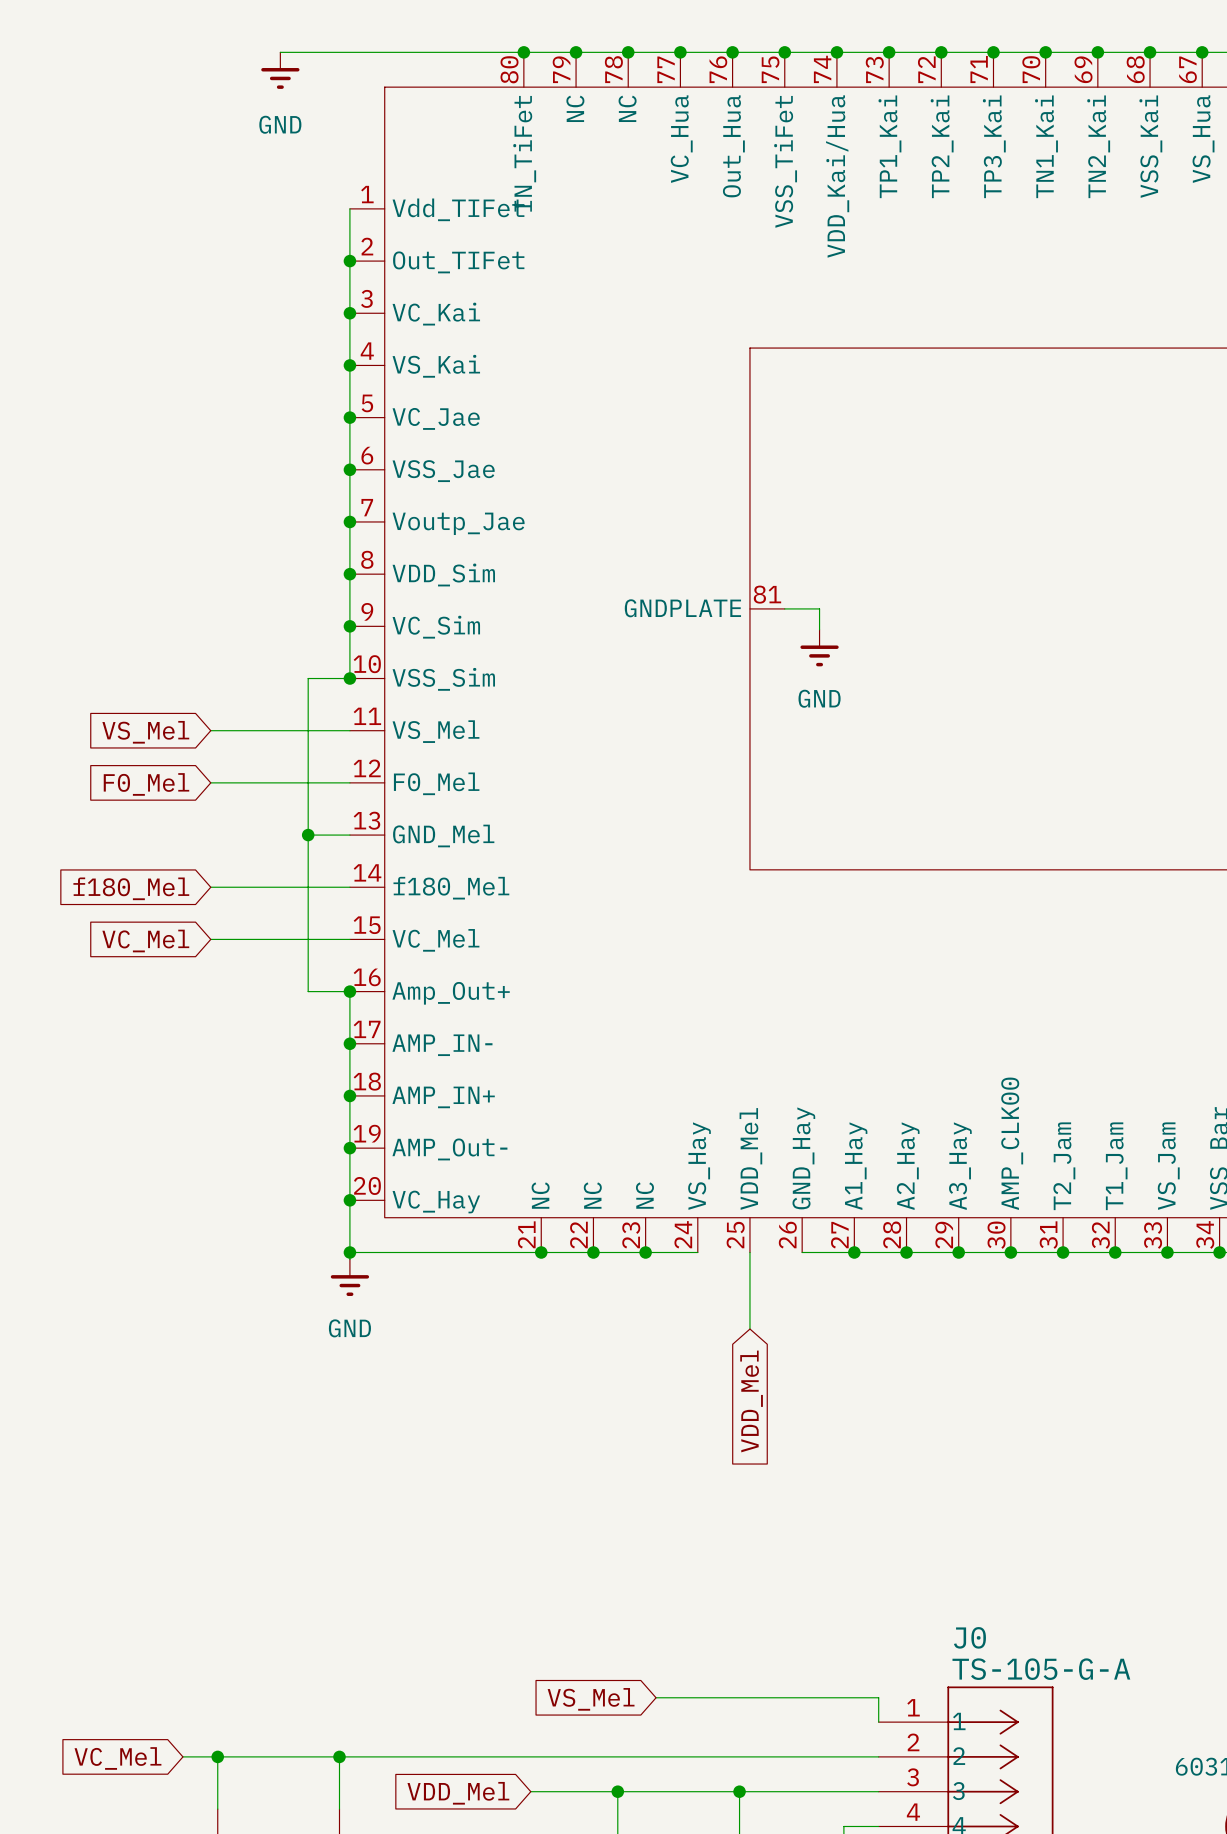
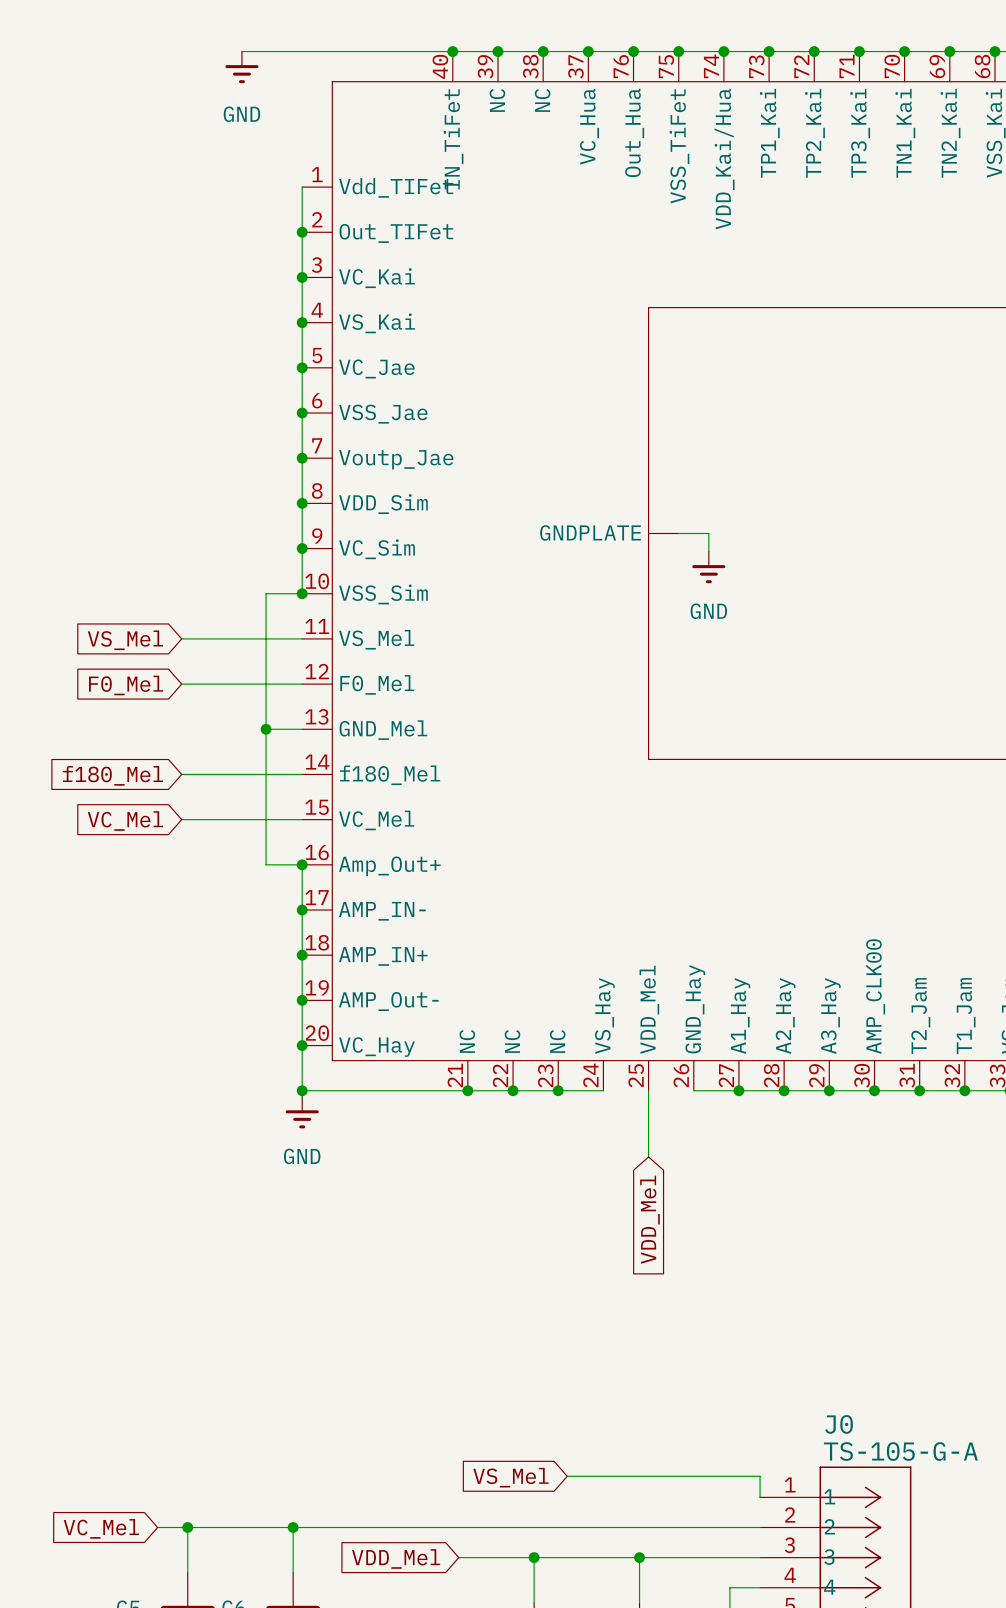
part pin number: 80 (509, 69) -> 40 (440, 66)
part pin number: 79 (561, 69) -> 39 (485, 66)
part pin number: 78 (613, 69) -> 38 (530, 66)
part pin number: 77 (666, 69) -> 37 (575, 66)
part pin number: 81 (767, 594) -> none

